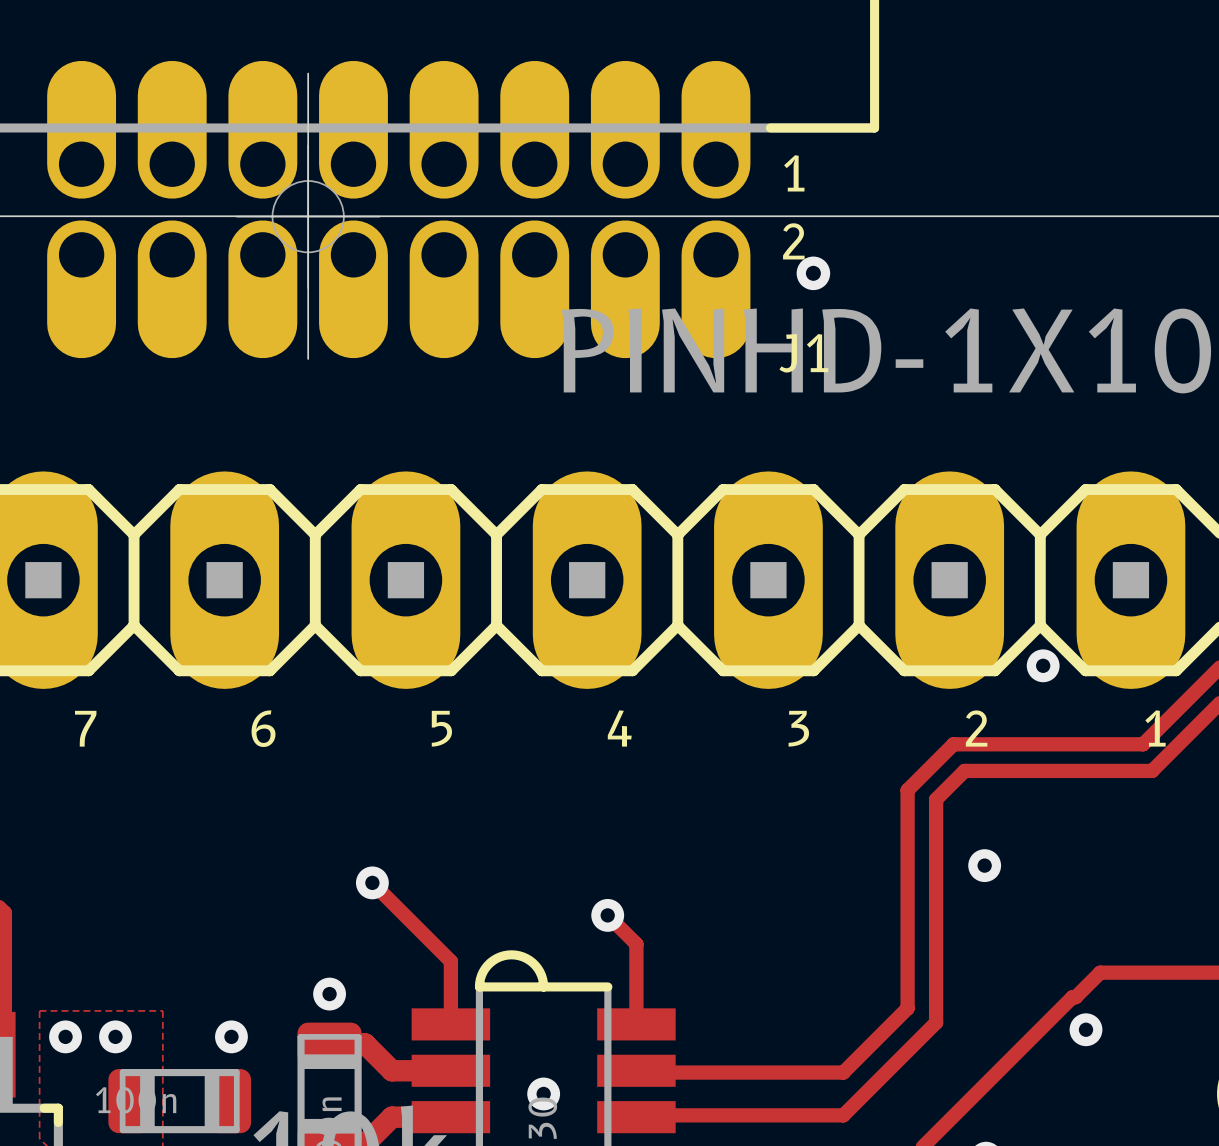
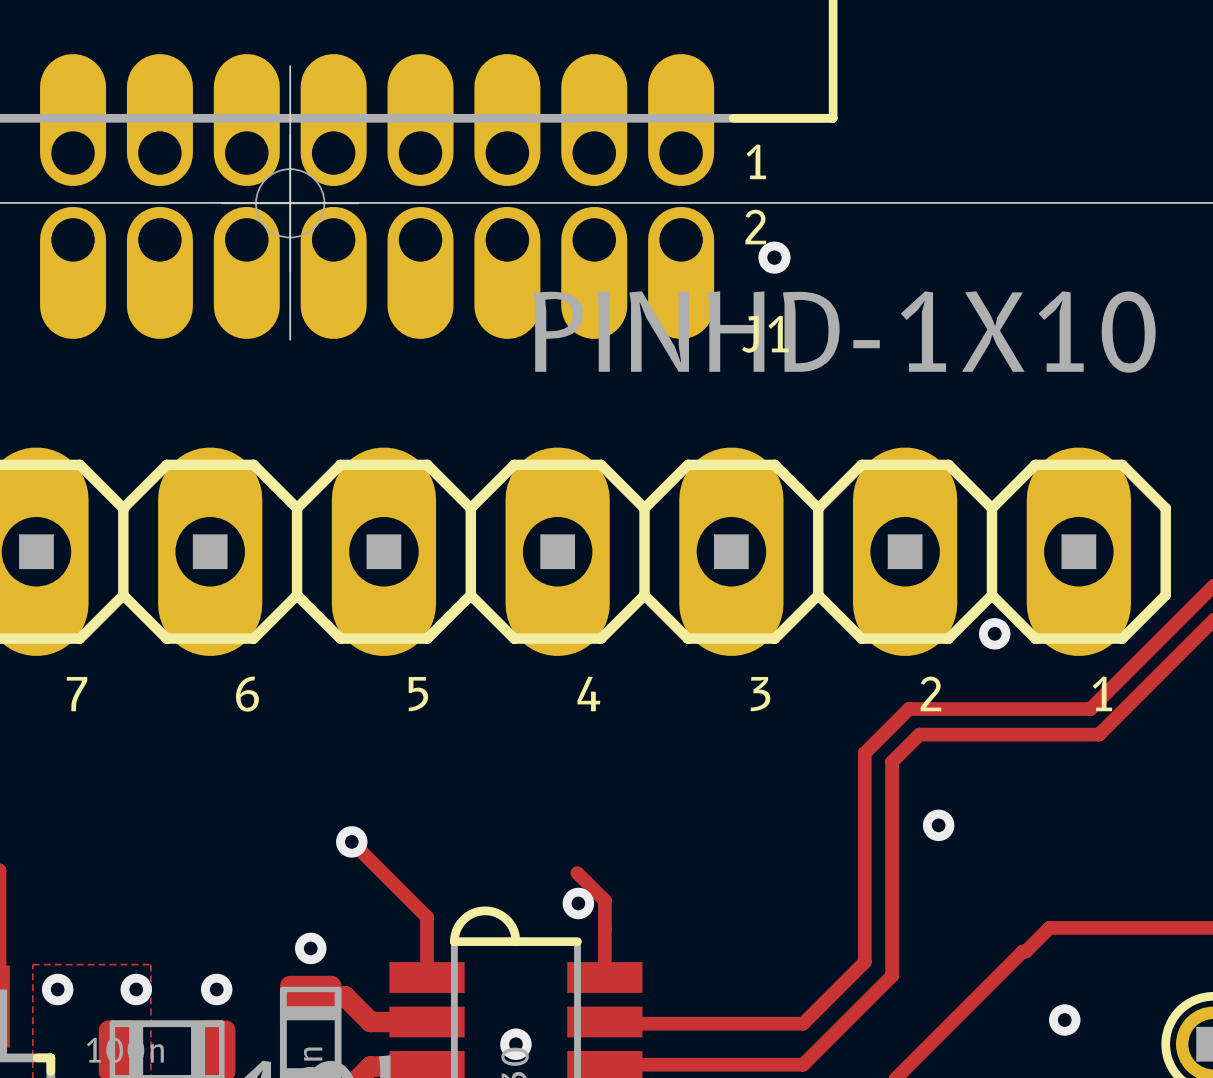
via position: (607, 915) -> (578, 903)
via position: (1085, 1029) -> (1064, 1020)
via position: (115, 1036) -> (136, 989)

